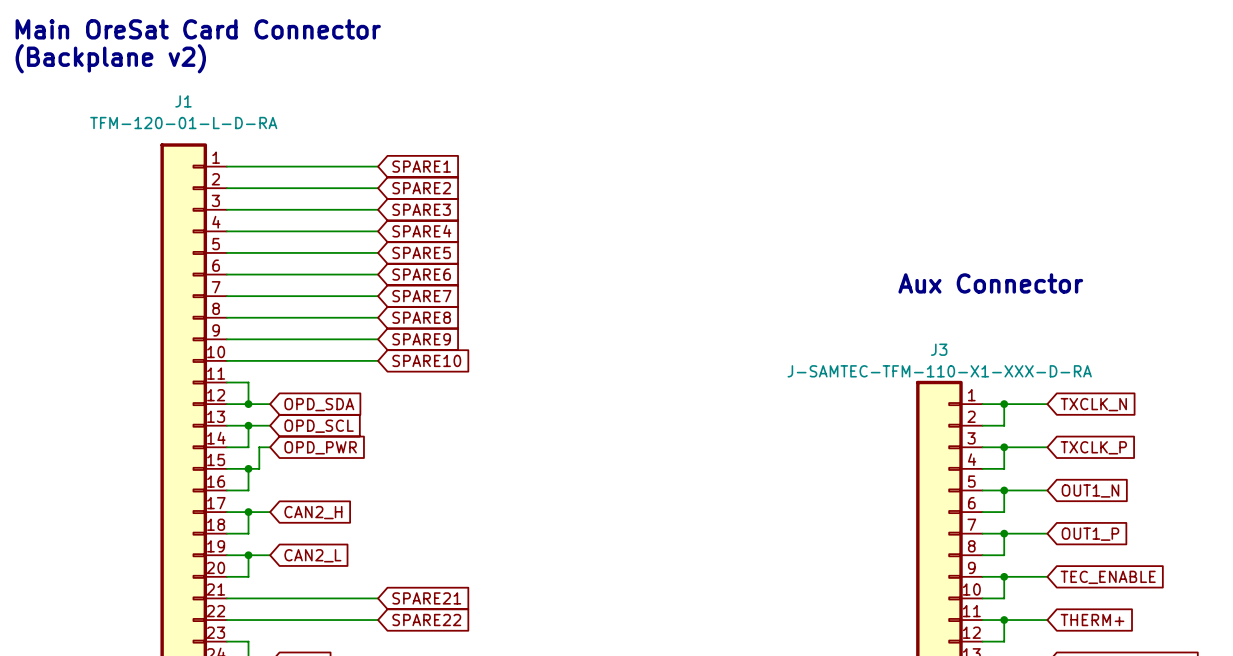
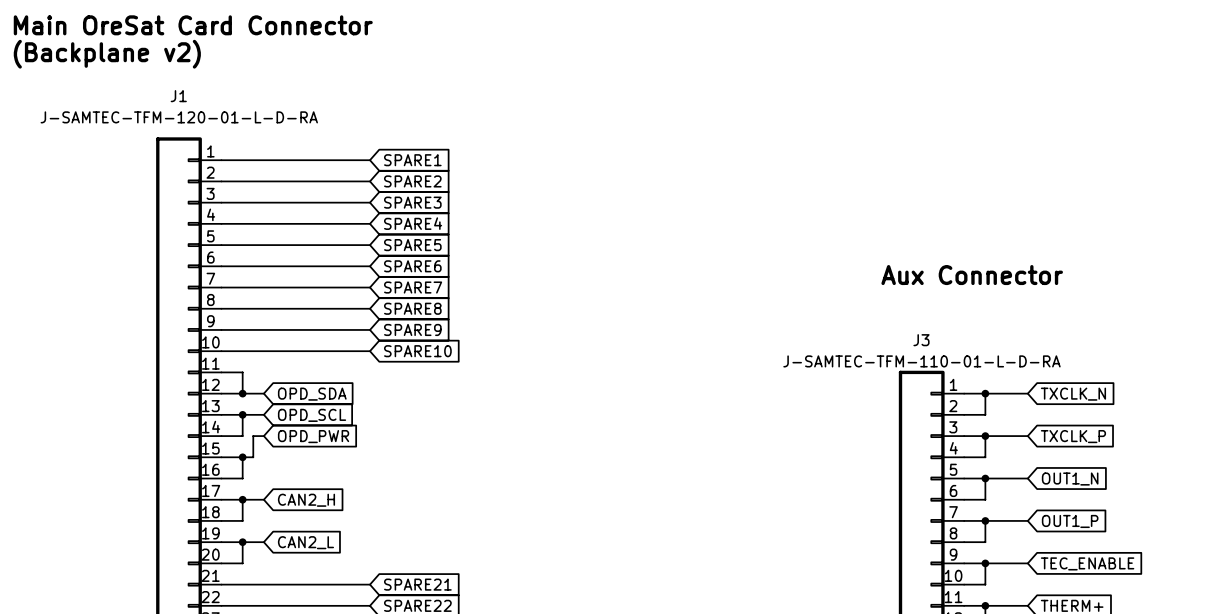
J1 value: TFM-120-01-L-D-RA (183, 123) -> J-SAMTEC-TFM-120-01-L-D-RA (179, 117)
J3 value: J-SAMTEC-TFM-110-X1-XXX-D-RA (939, 371) -> J-SAMTEC-TFM-110-01-L-D-RA (921, 361)

